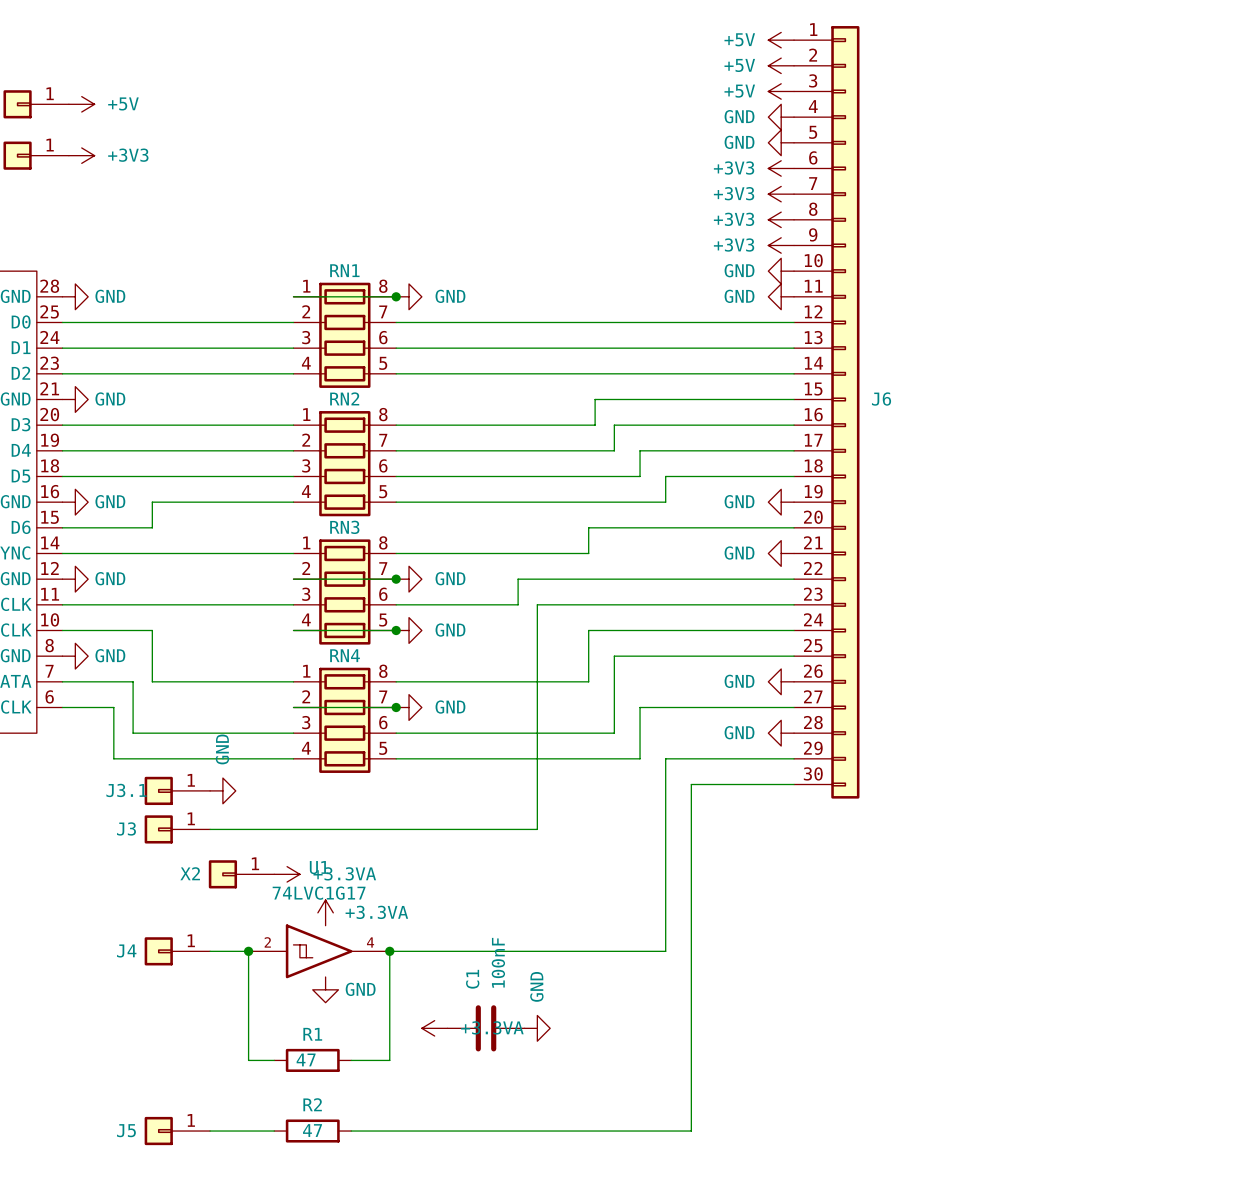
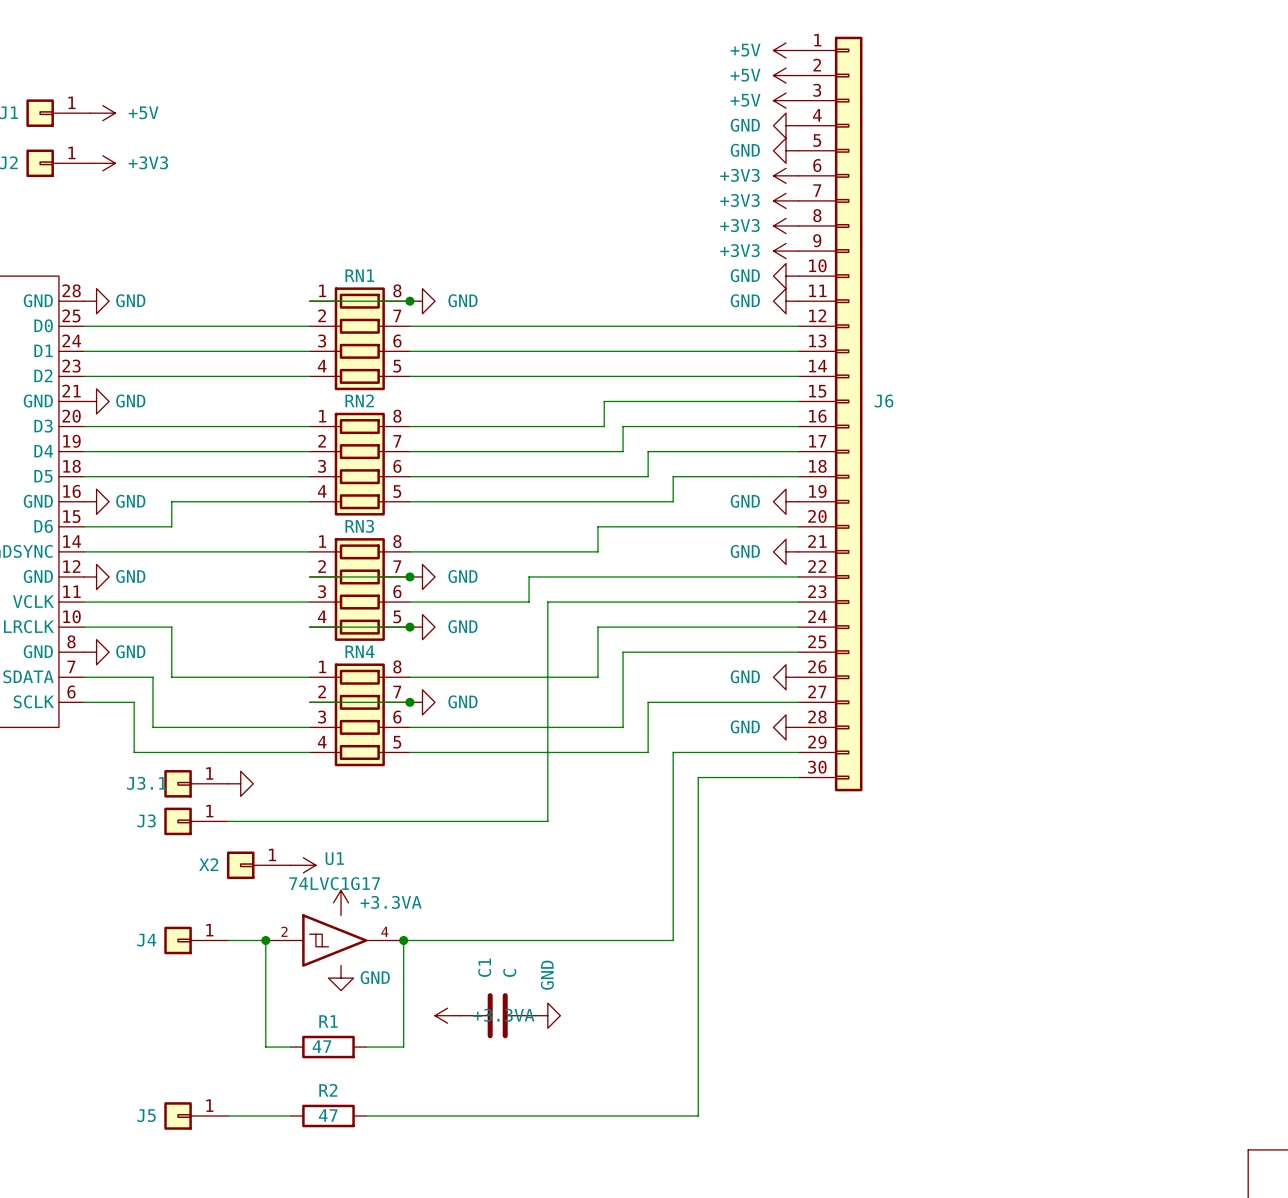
power symbol text: GND (222, 749) -> none
power symbol text: +3.3VA (344, 873) -> none
C1 value: 100nF (498, 962) -> C (509, 973)

